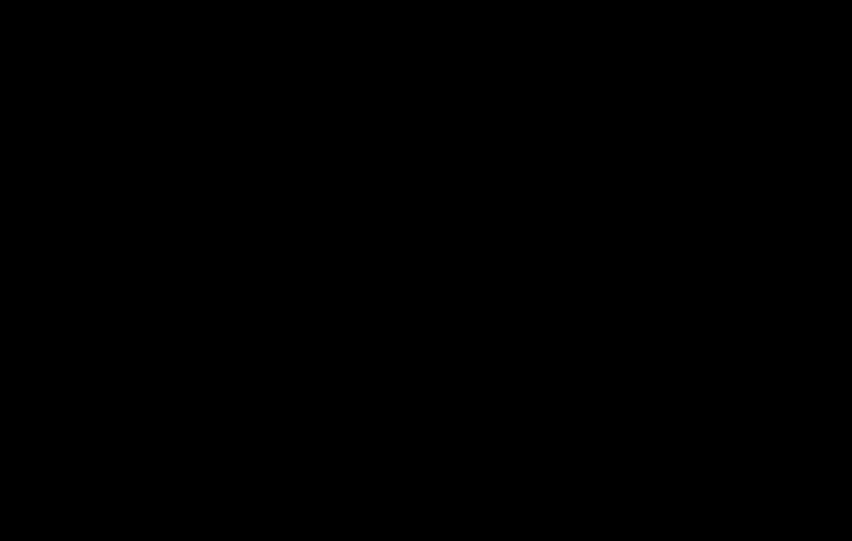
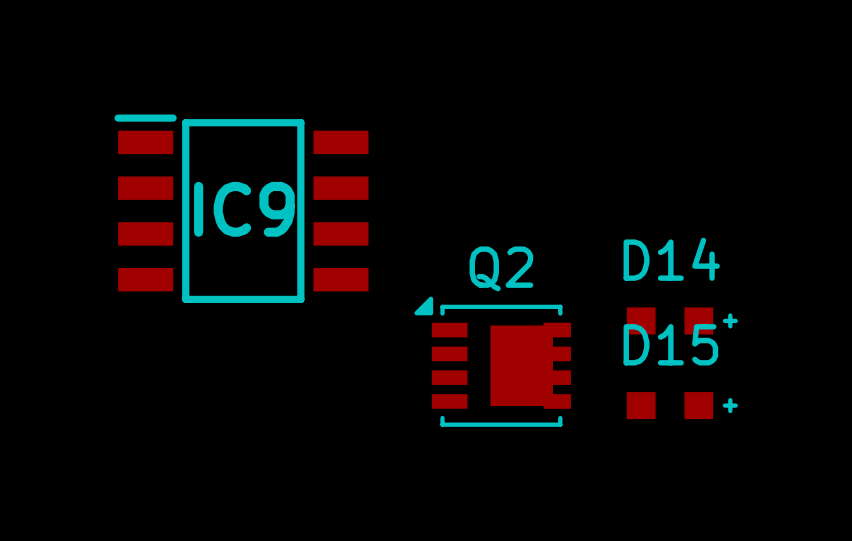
IC9: none -> (241, 208)
D14: none -> (682, 320)
Q2: none -> (492, 361)
D15: none -> (682, 405)

